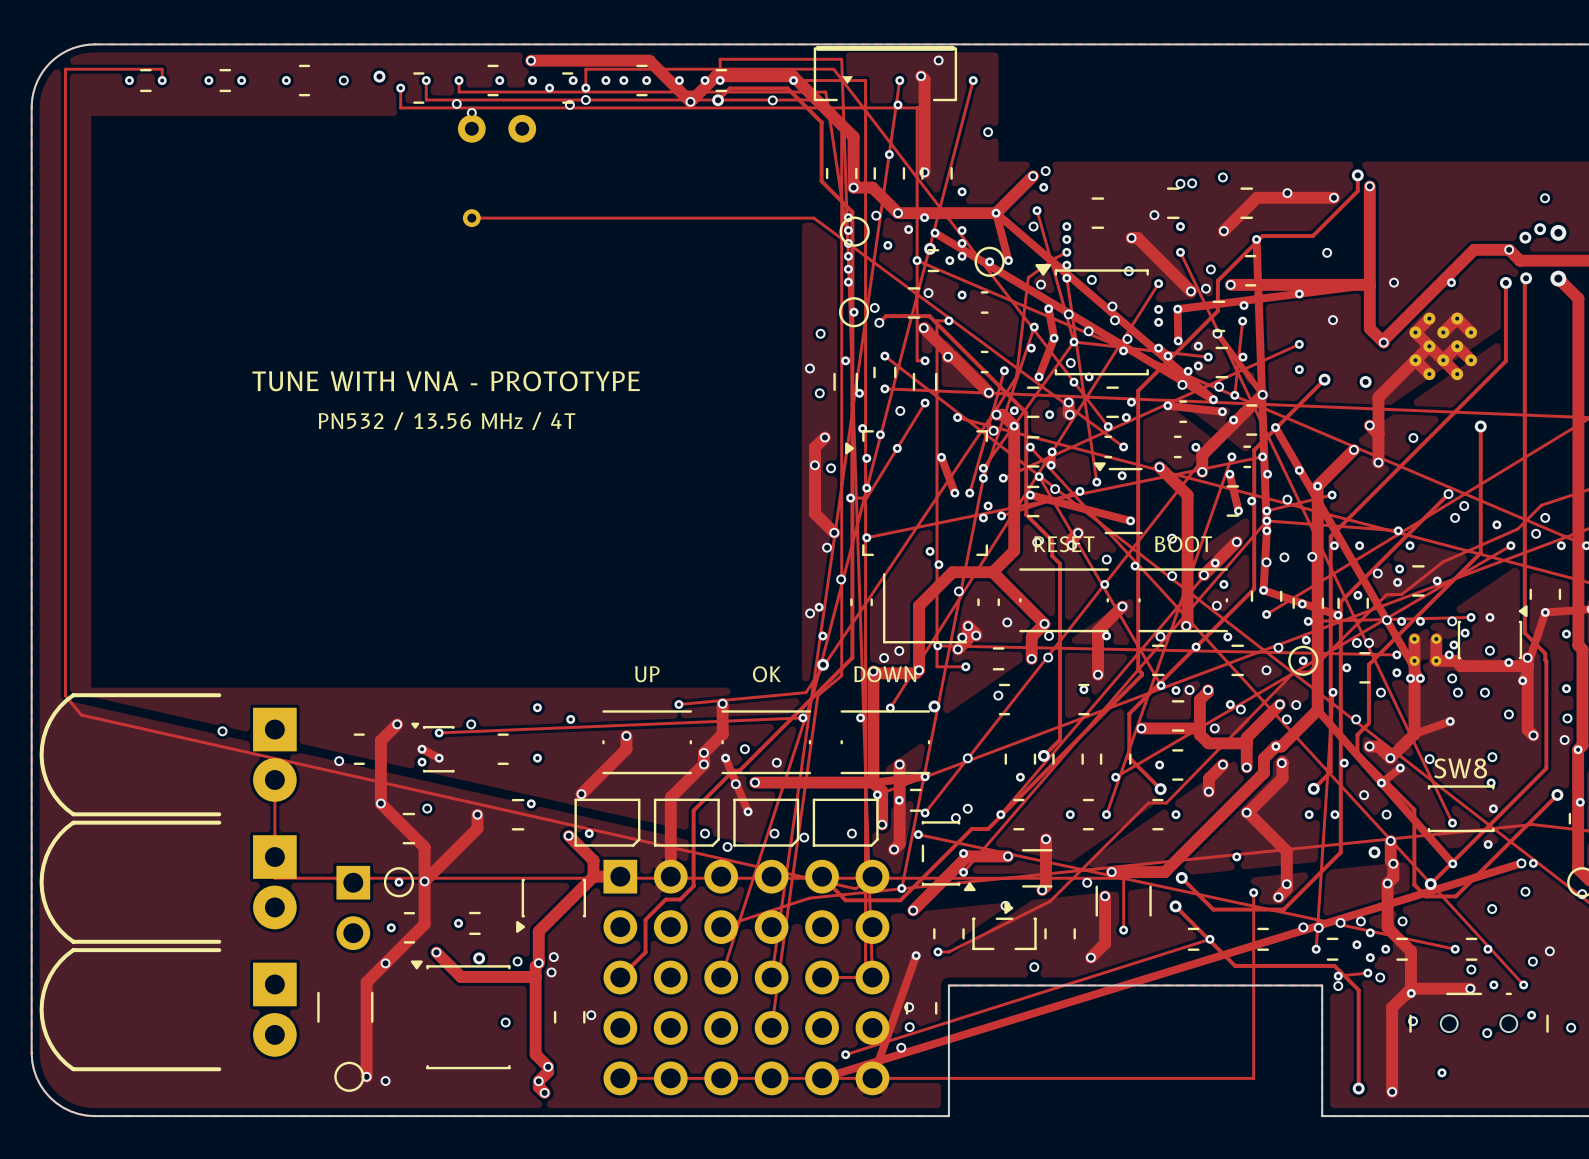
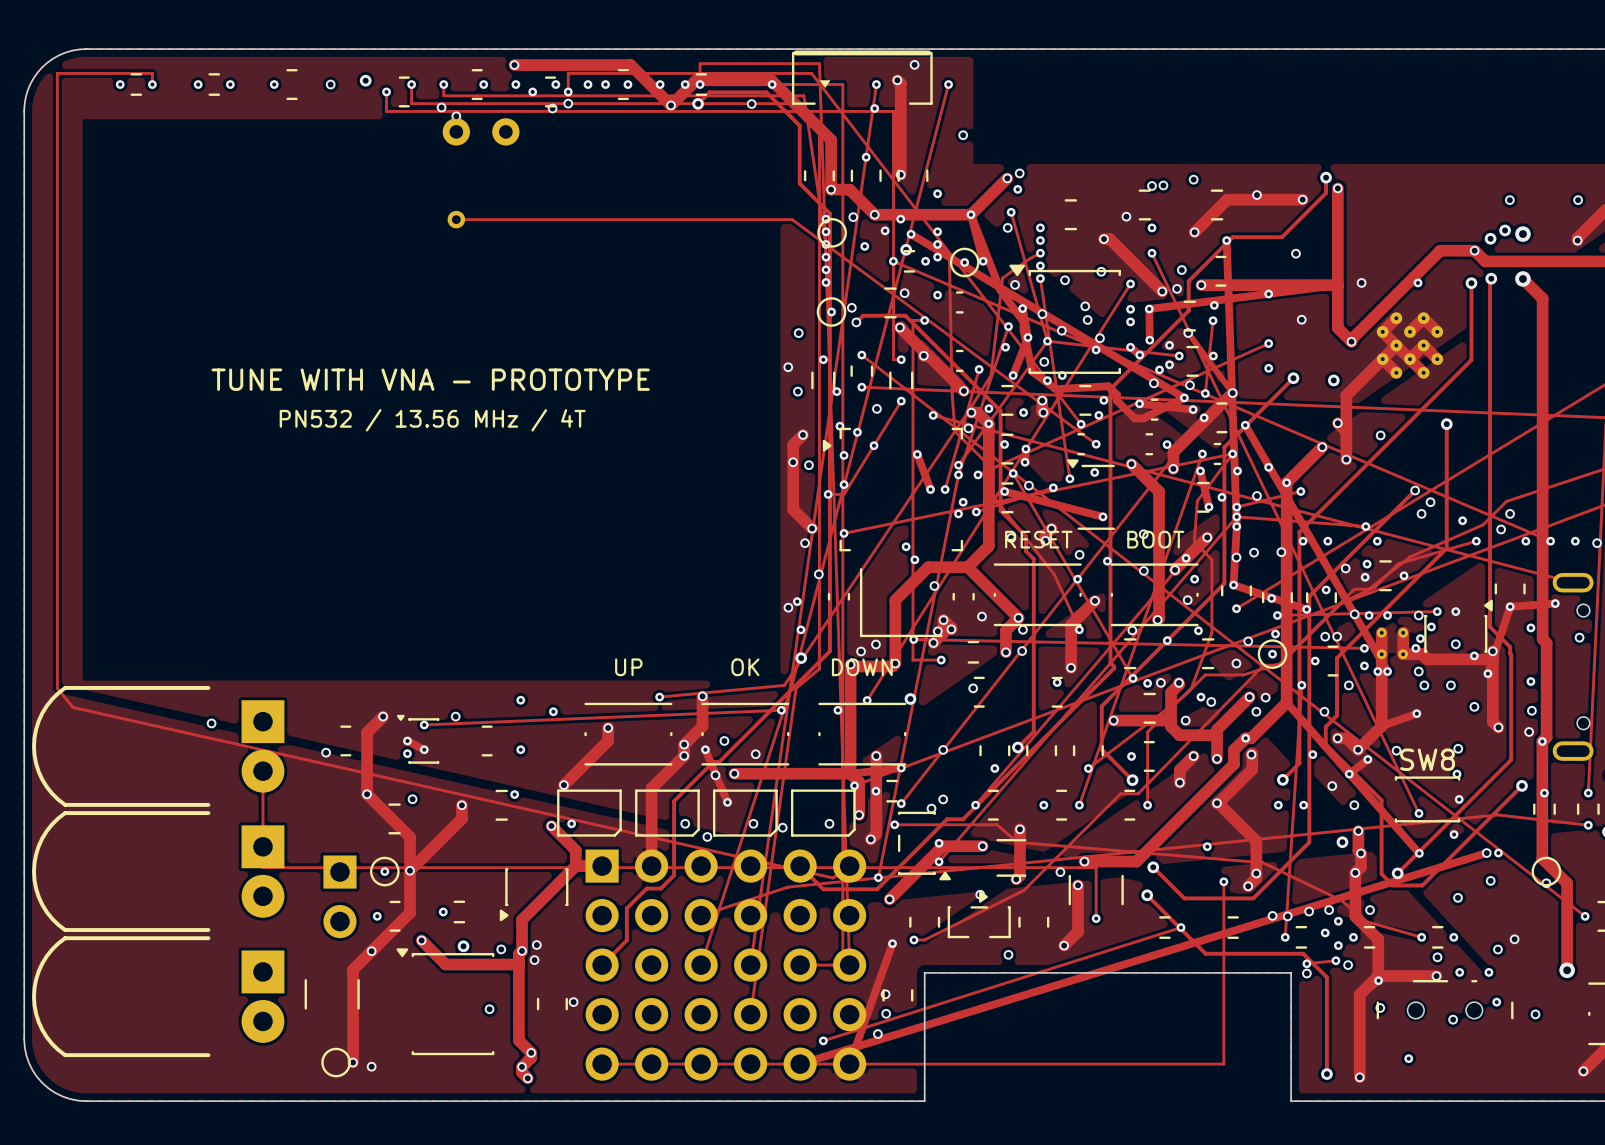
track: (996, 213) (1213, 399) -> (971, 214) (1000, 289) (1023, 321) (1023, 330) (1032, 371) (1055, 389) (1108, 386) (1117, 395) (1117, 400) (1134, 418) (1143, 418) (1184, 397)
track: none -> (937, 244) (940, 244) (949, 253) (952, 396) (955, 431) (993, 469) (993, 495) (1054, 574) (1079, 629)
track: (1030, 447) (1523, 984) -> none
track: none -> (1232, 453) (1197, 501) (1194, 542) (1211, 559) (1211, 632) (1191, 688) (1147, 732) (1147, 805)
track: (1510, 545) (1115, 777) -> (1476, 541) (1398, 563) (1374, 587) (1342, 601) (1281, 663) (1243, 674) (1205, 674) (1184, 695) (1088, 768)
track: (918, 834) (1455, 949) -> (894, 824) (997, 824) (1017, 842) (1263, 862) (1342, 900) (1365, 921) (1421, 937)

